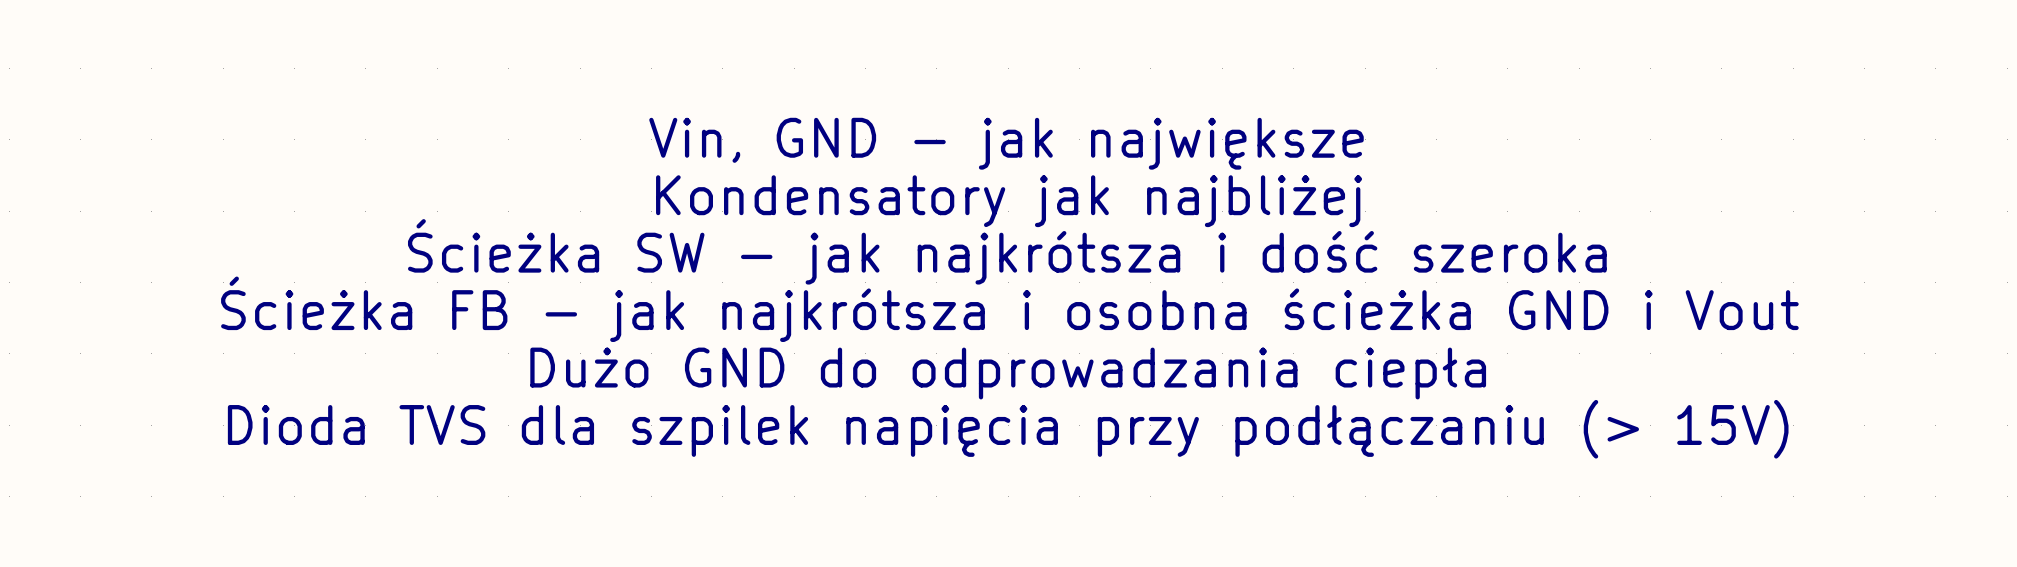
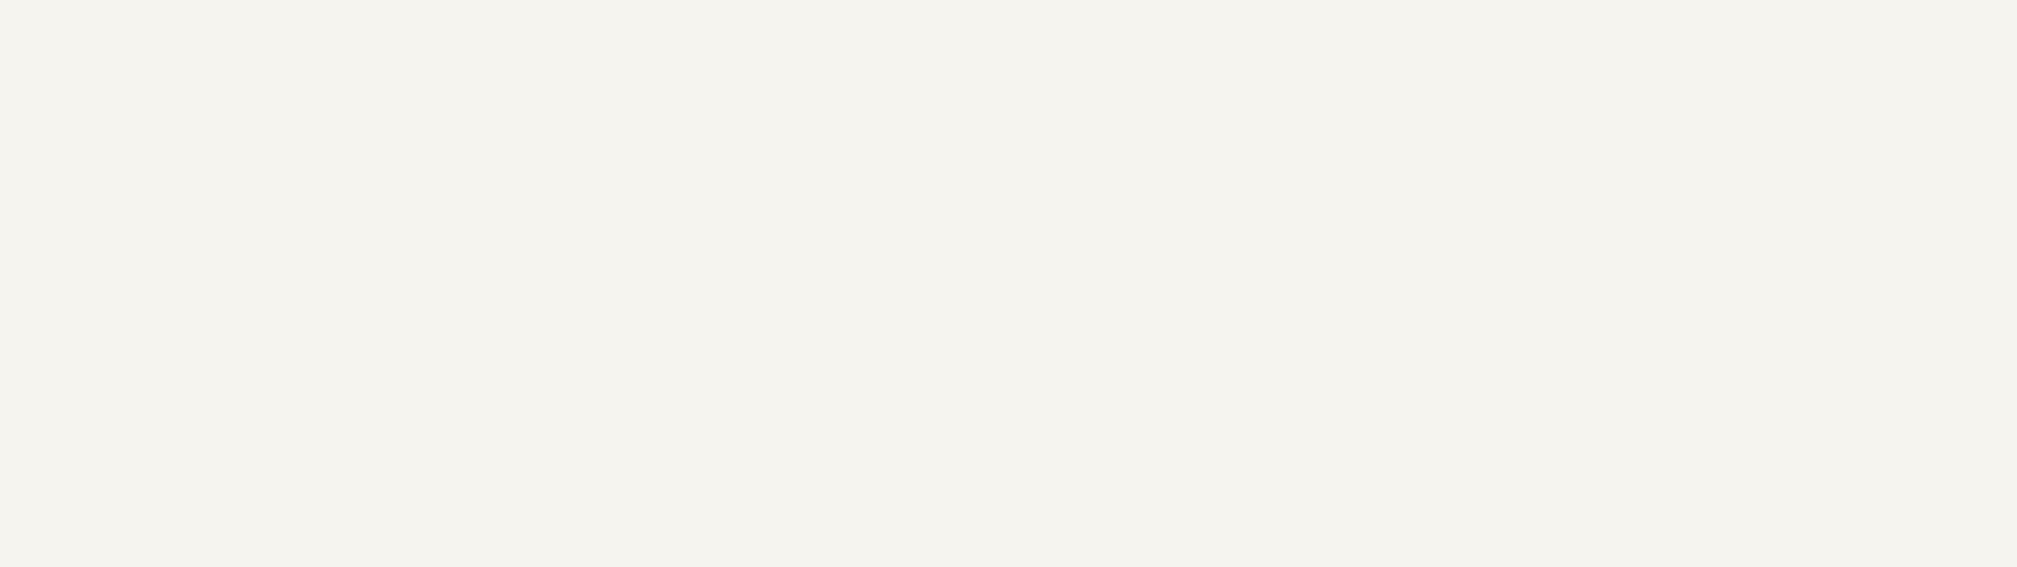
text: Vin, GND - jak największe (1006, 143) -> none
text: Kondensatory jak najbliżej (1009, 201) -> none
text: Ścieżka SW - jak najkrótsza i dość szeroka (1007, 251) -> none
text: Ścieżka FB - jak najkrótsza i osobna ścieżka GND i Vout (1009, 309) -> none
text: Dużo GND do odprowadzania ciepła (1008, 373) -> none
text: Dioda TVS dla szpilek napięcia przy podłączaniu (> 15V) (1008, 429) -> none

